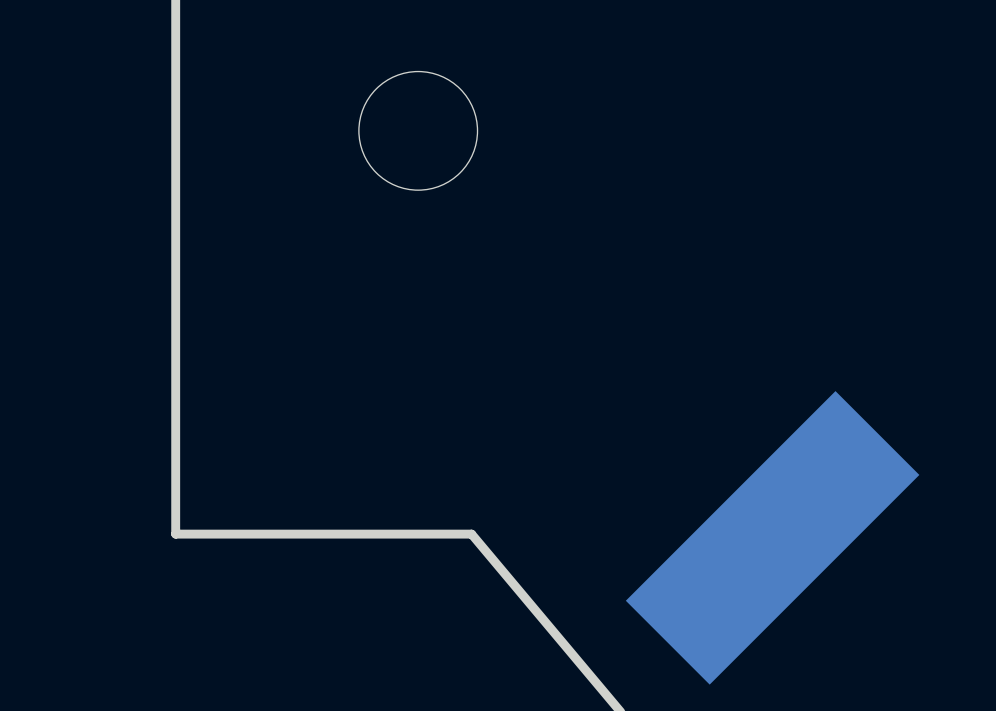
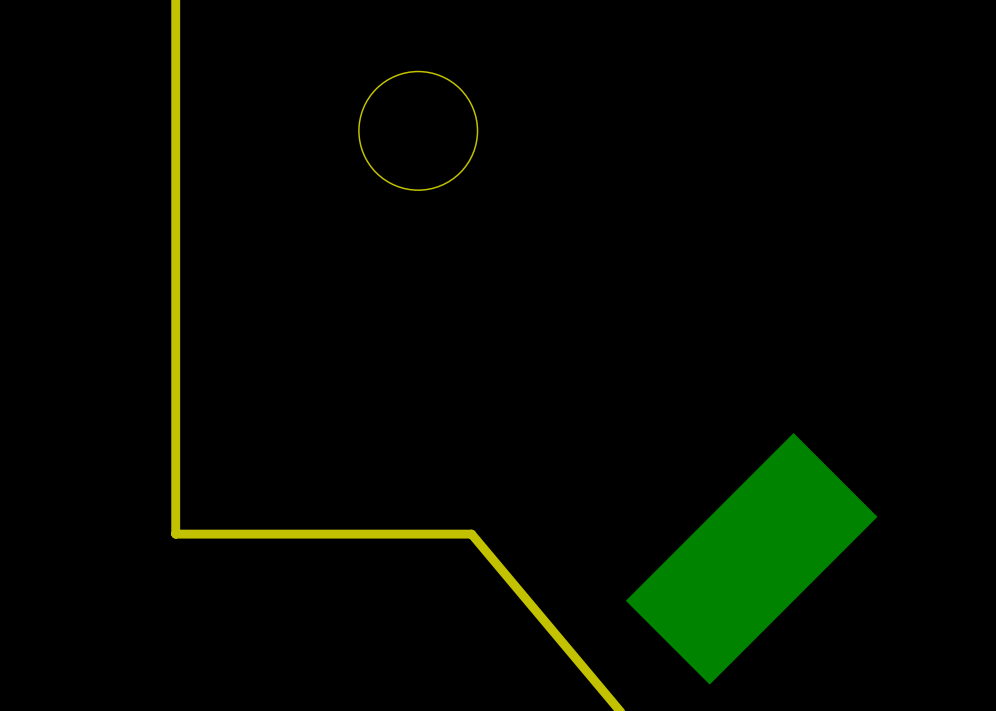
part footprint: [625, 391, 920, 685] -> [625, 433, 878, 685]

